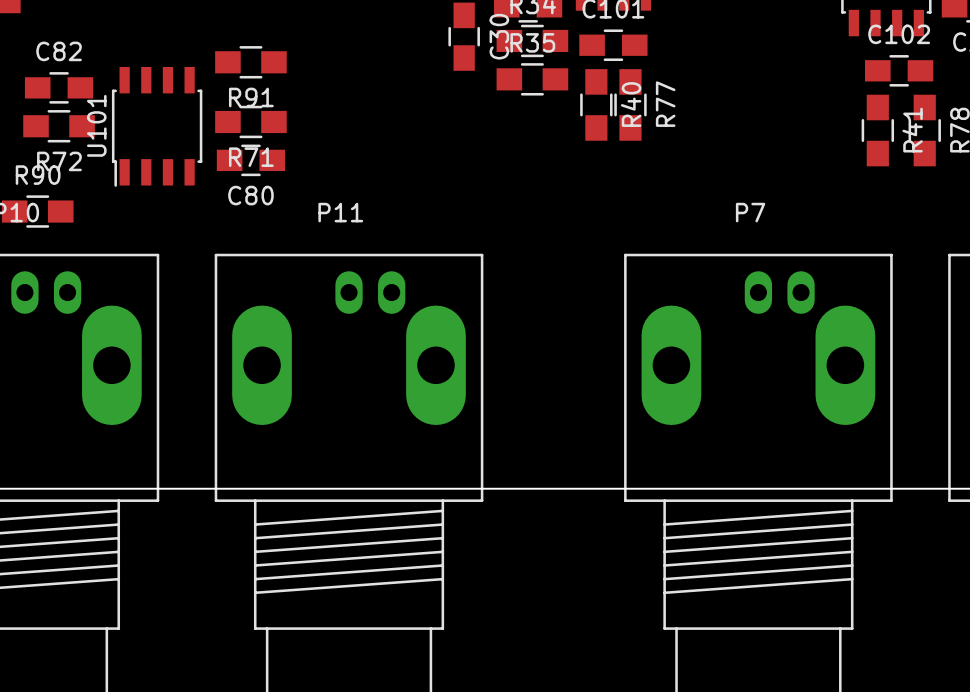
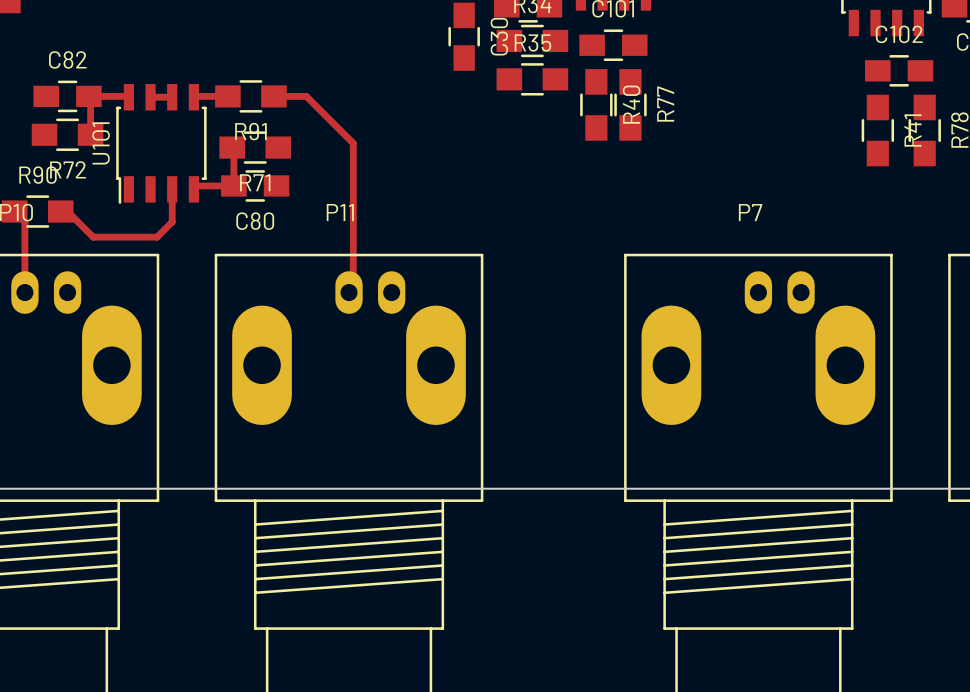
R91 position: (250, 62) -> (250, 96)
C82 position: (59, 87) -> (67, 96)
track: none -> (227, 96) (193, 97)
track: none -> (273, 96) (306, 96) (353, 143) (353, 288) (349, 292)
track: none -> (128, 97) (88, 96) (90, 98) (90, 134)
track: none -> (150, 97) (172, 97)
R71 position: (250, 121) -> (255, 147)
R72 position: (59, 126) -> (67, 134)
U101 position: (157, 126) -> (161, 143)
track: none -> (232, 147) (233, 149) (233, 185) (197, 185) (193, 189)
C80 position: (250, 160) -> (255, 185)
track: none -> (172, 189) (172, 222) (157, 237) (93, 237) (67, 211) (60, 211)
track: none -> (14, 211) (24, 221) (24, 292)

